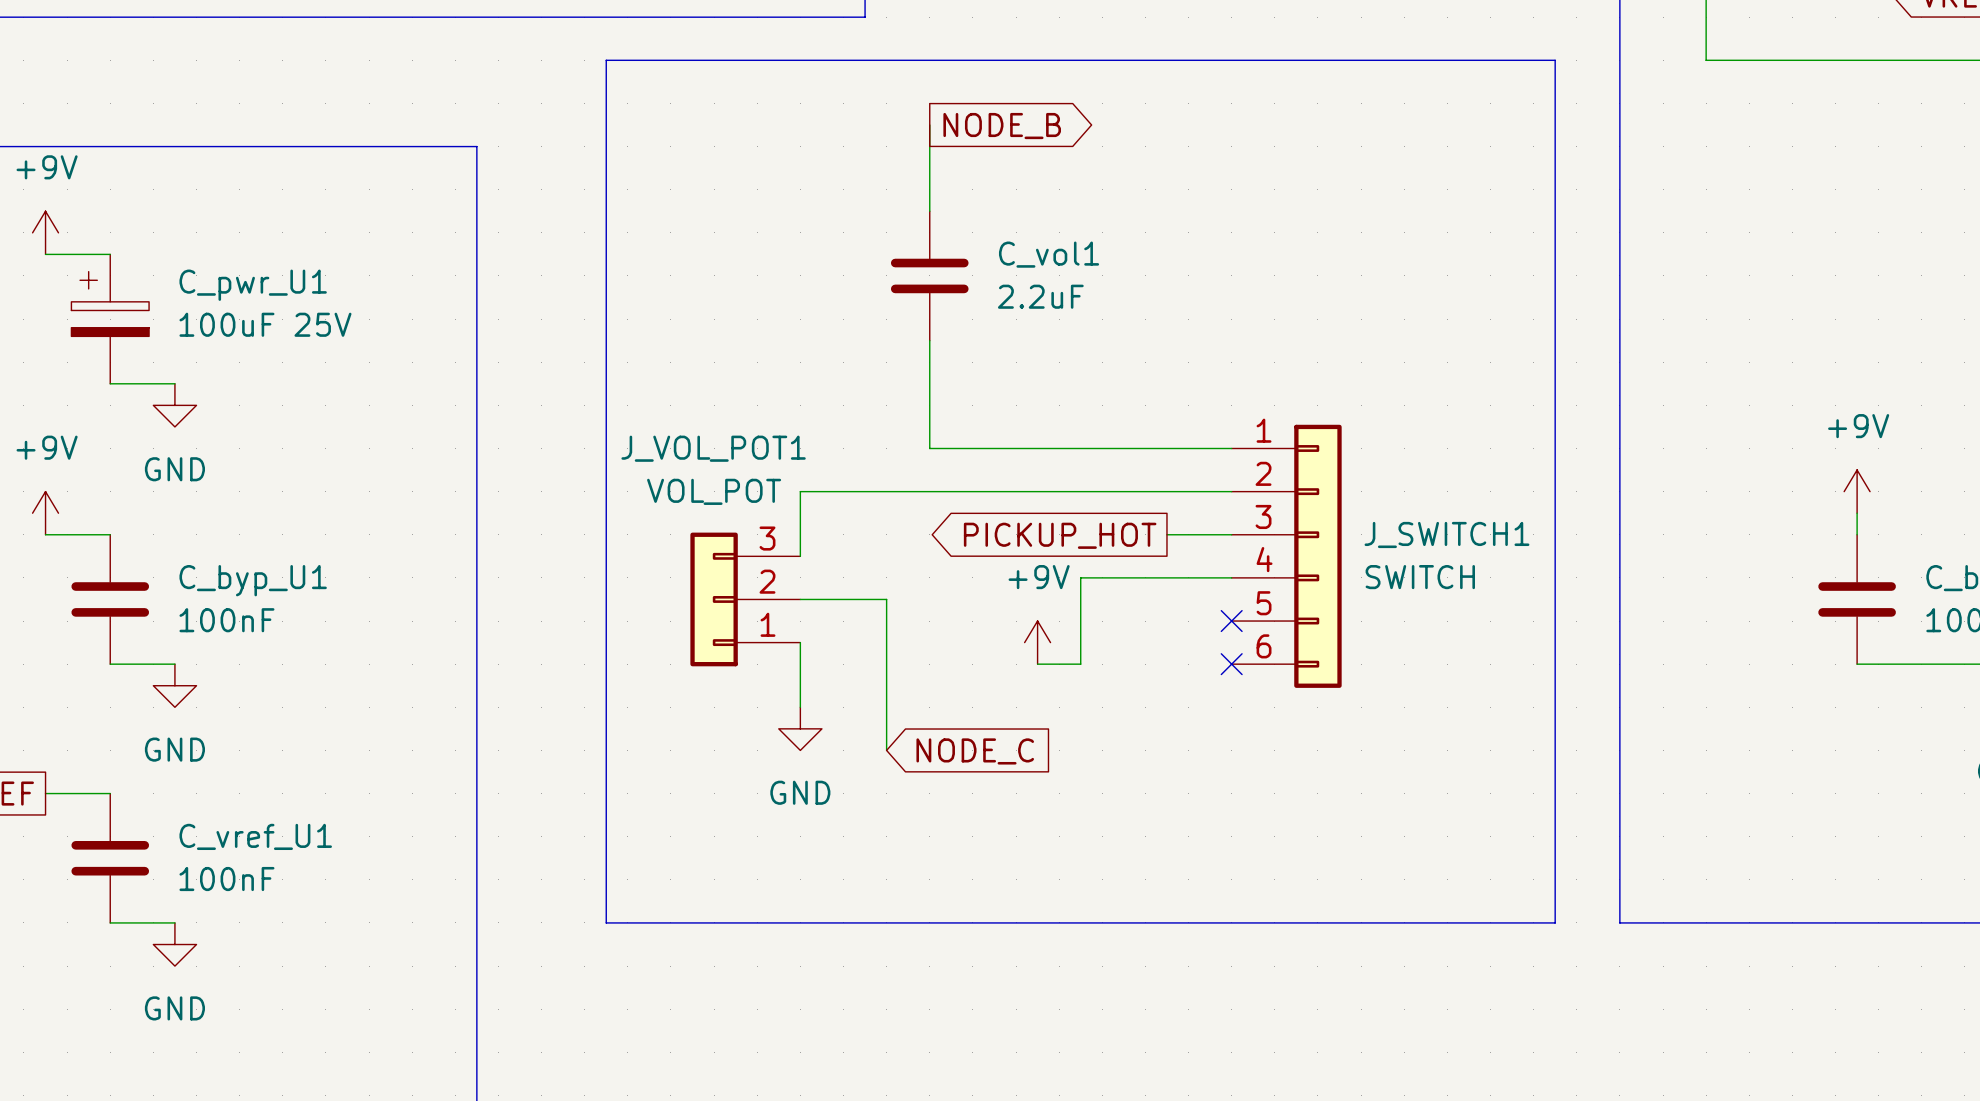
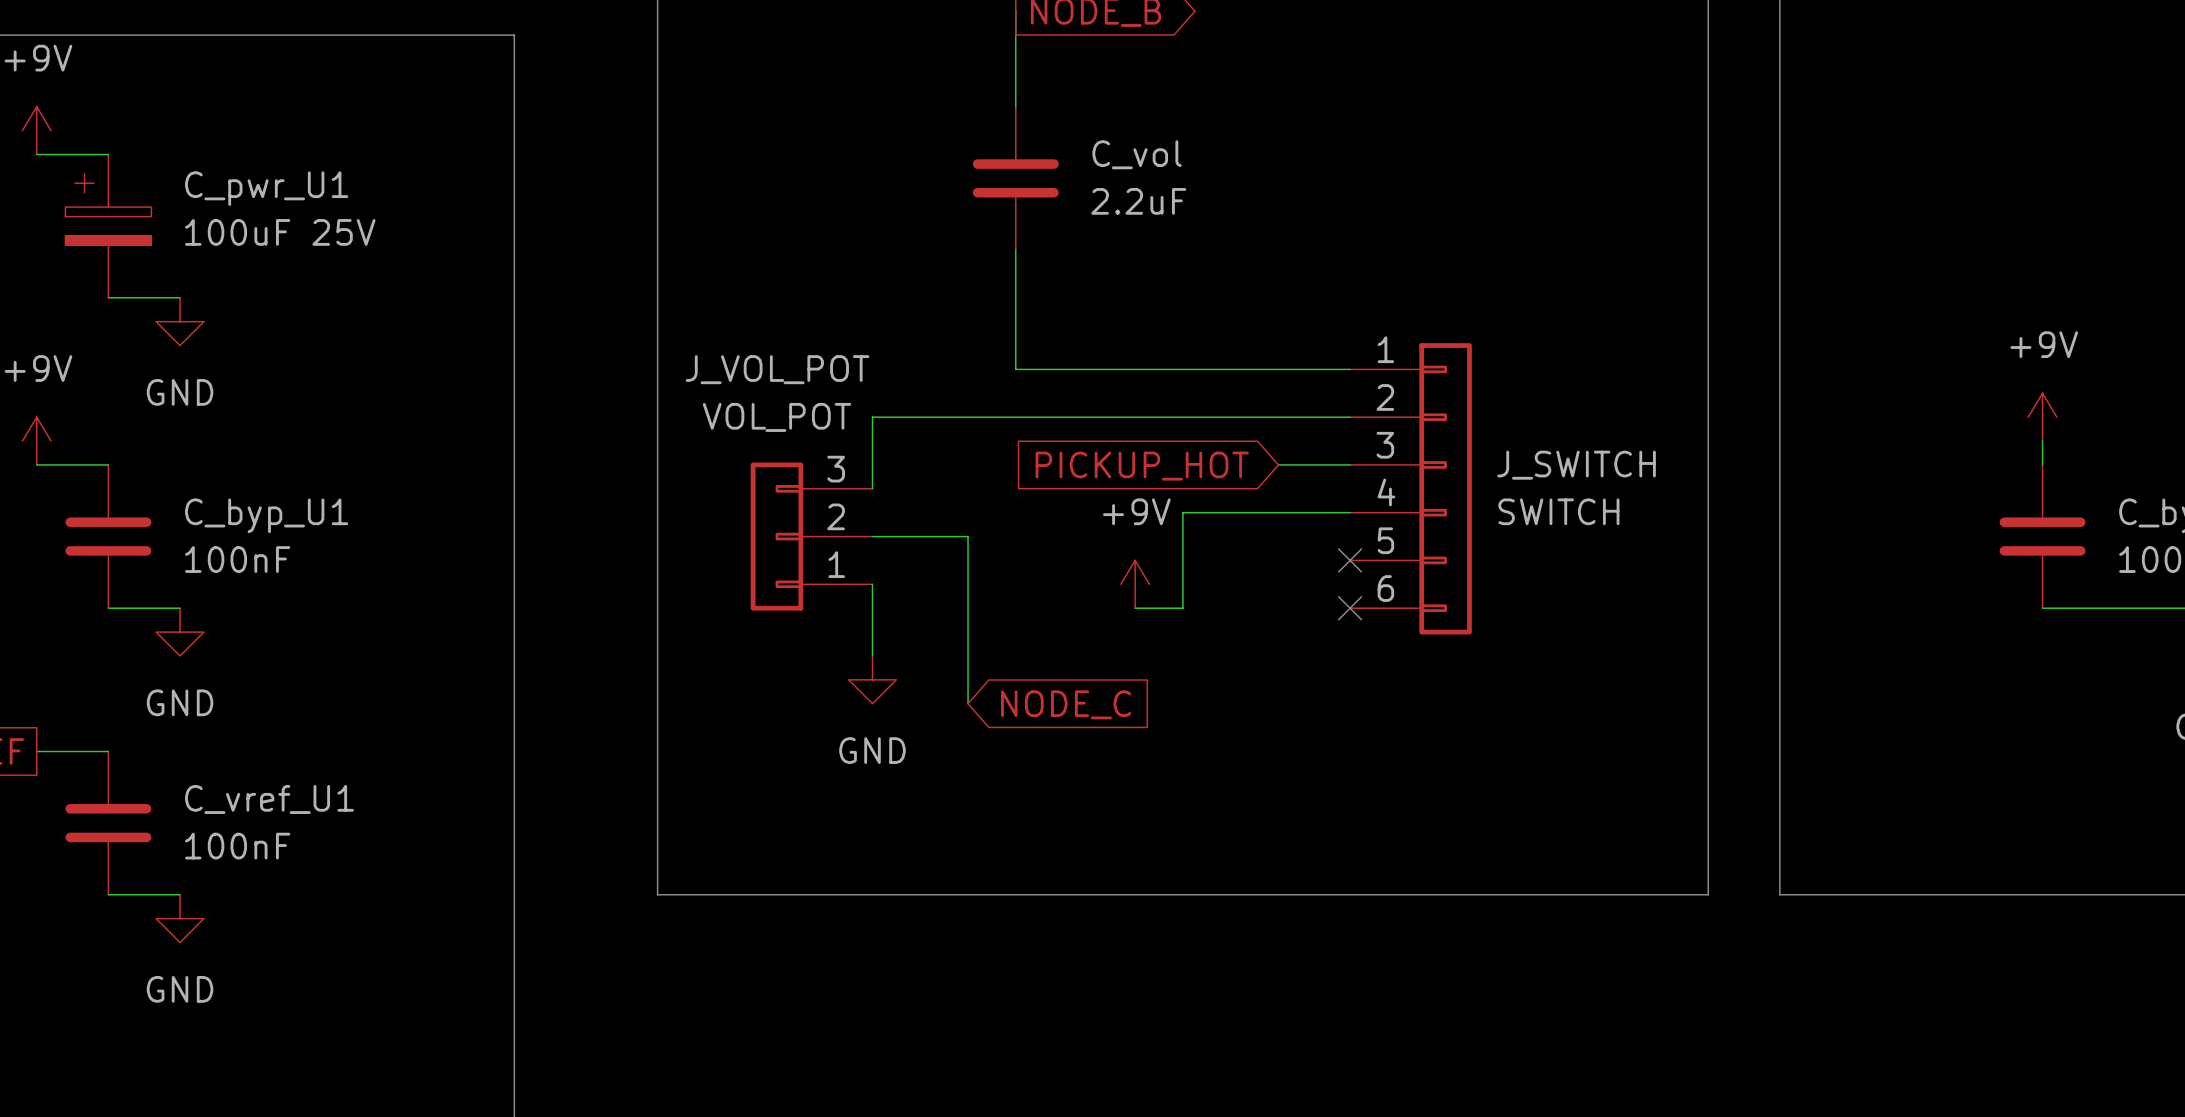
C_vol1 name: C_vol1 (1049, 254) -> C_vol (1137, 154)
J_VOL_POT1 name: J_VOL_POT1 (713, 448) -> J_VOL_POT (777, 369)
J_SWITCH1 name: J_SWITCH1 (1446, 534) -> J_SWITCH (1576, 465)
global label shape: output (1060, 535) -> input (1142, 466)

